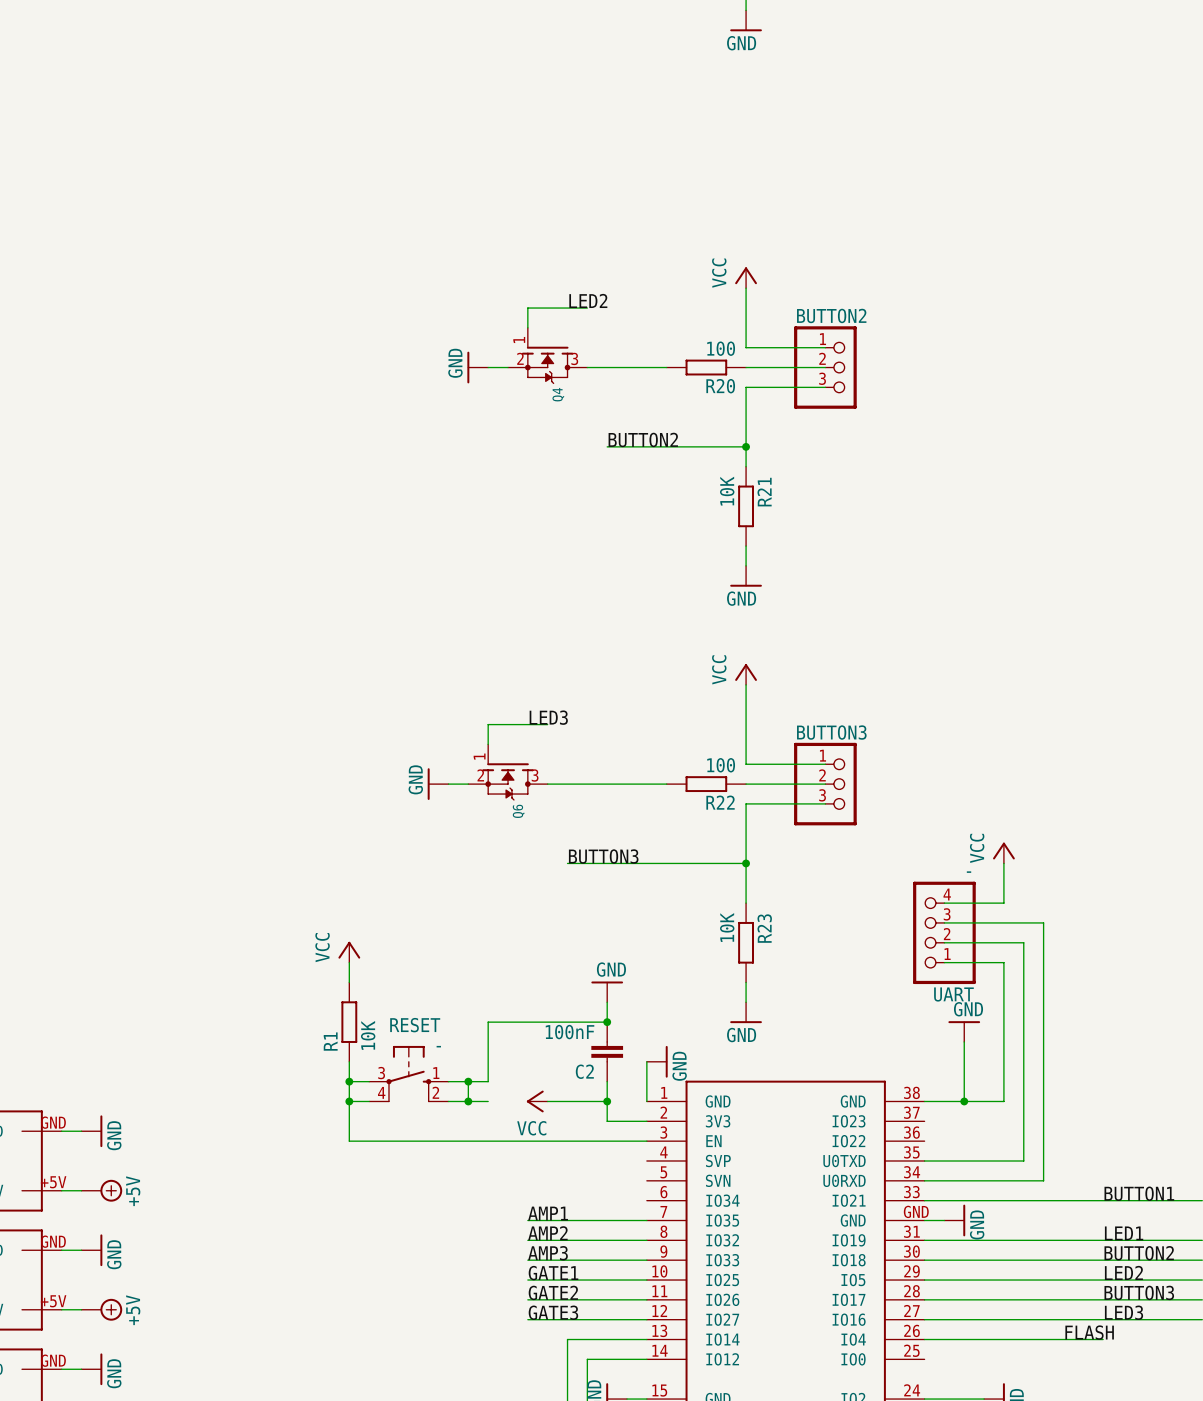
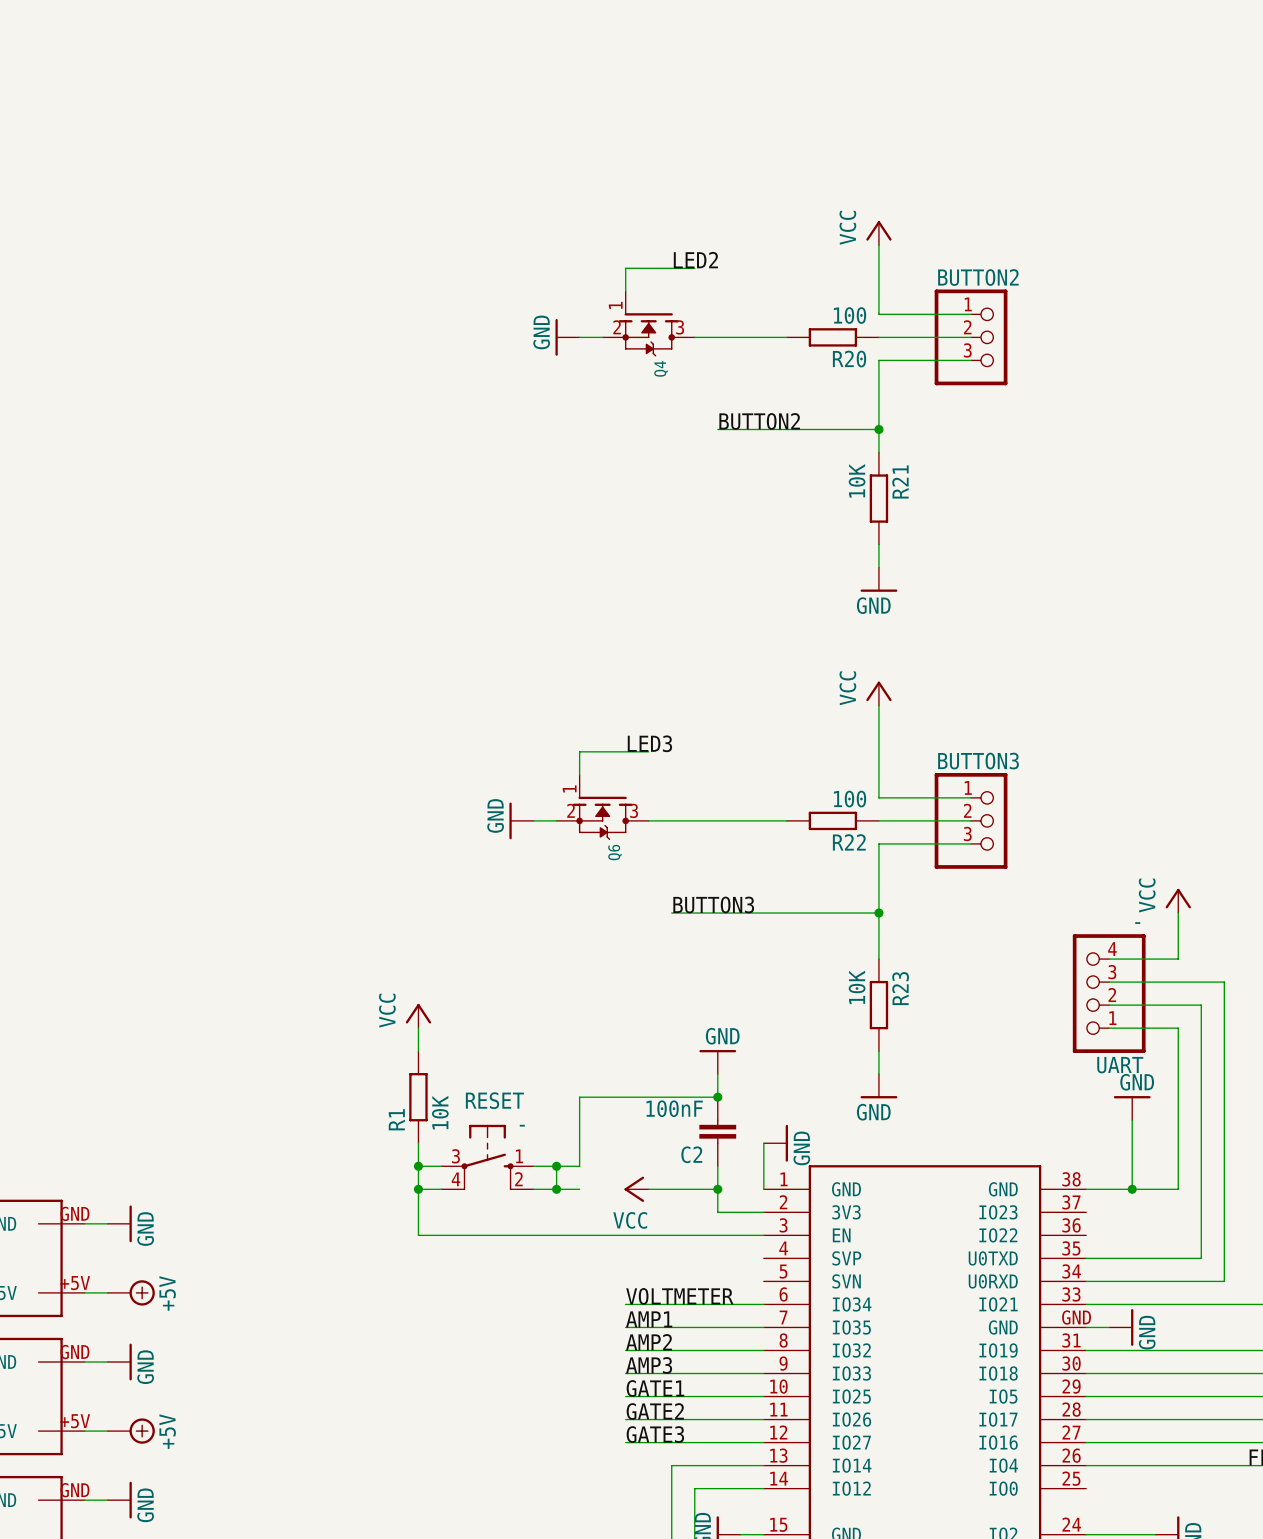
label: none -> VOLTMETER (679, 1296)
wire: none -> (625, 1304) (763, 1304)

